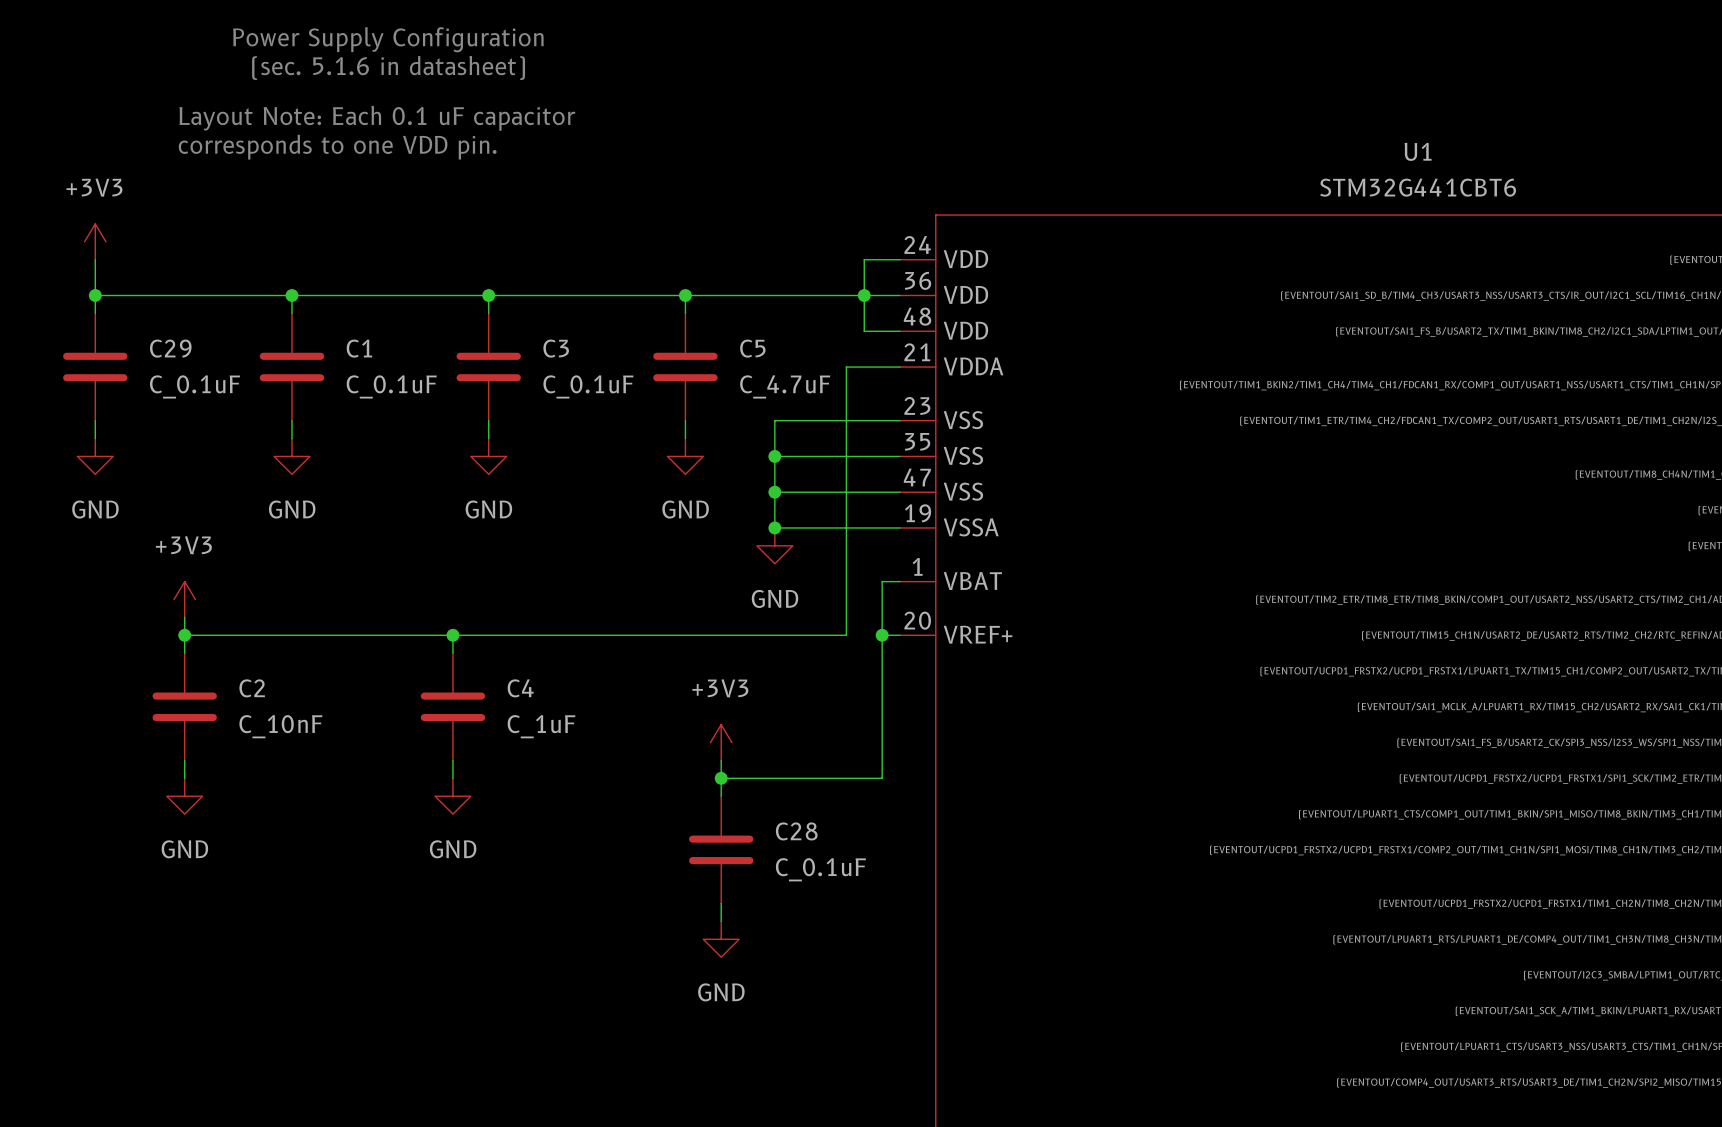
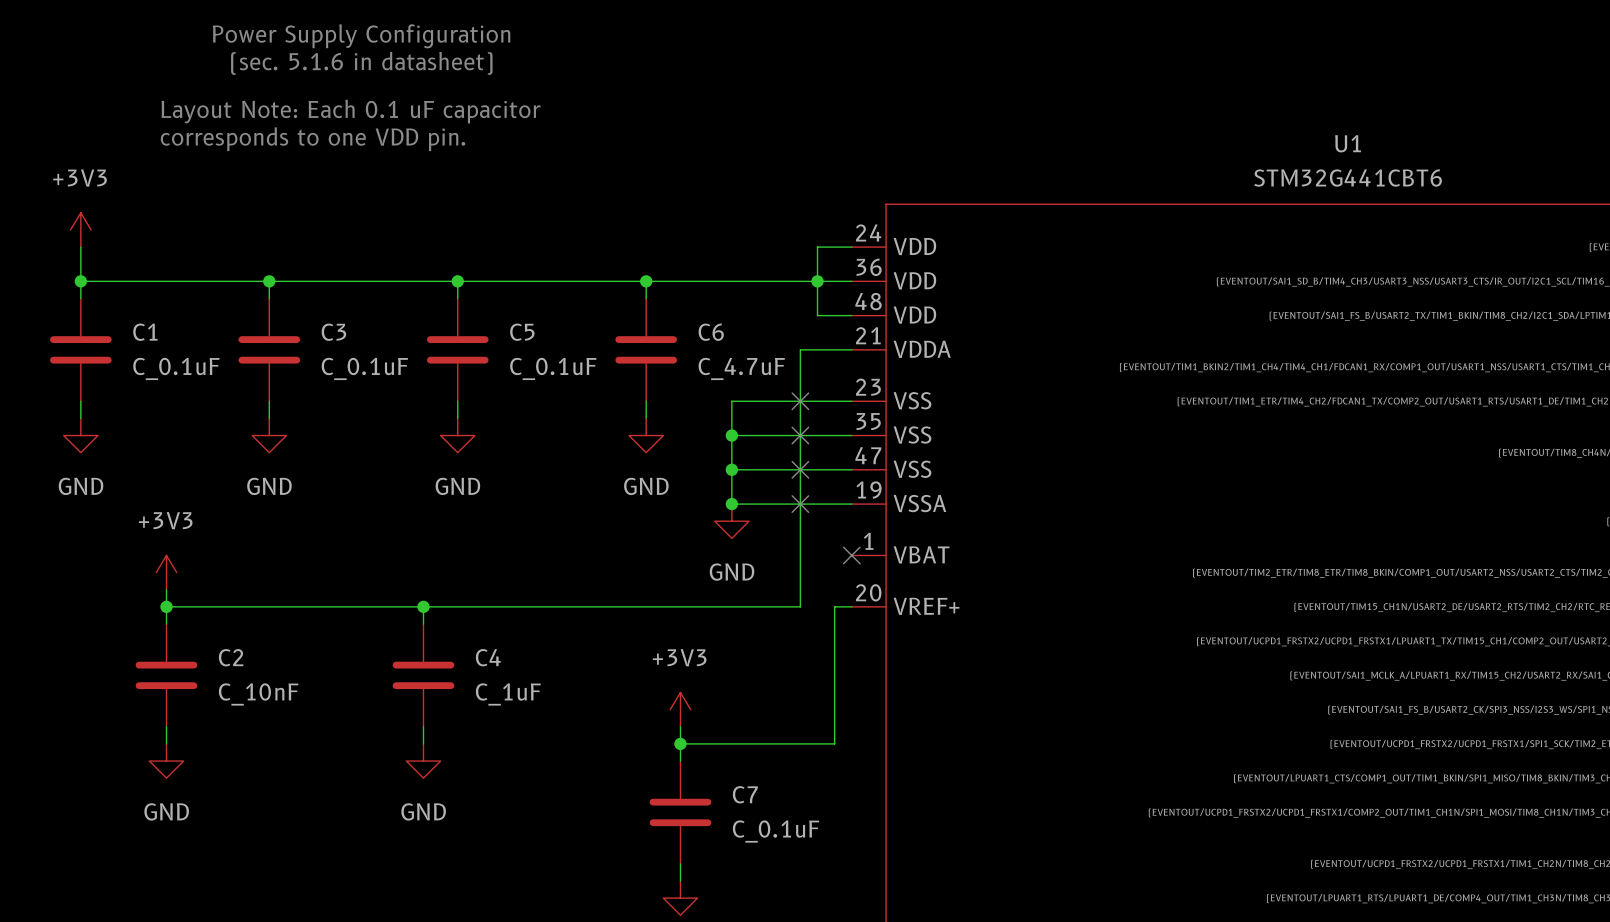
C29 name: C29 (170, 348) -> C1 (145, 332)
C1 name: C1 (359, 348) -> C3 (333, 332)
C3 name: C3 (556, 348) -> C5 (522, 332)
C5 name: C5 (752, 348) -> C6 (711, 332)
no-connect mark: none -> (800, 401)
no-connect mark: none -> (800, 435)
no-connect mark: none -> (800, 469)
no-connect mark: none -> (800, 504)
wire: (900, 581) (882, 581) (882, 635) -> none
no-connect mark: none -> (851, 555)
junction: (882, 635) -> none
C28 name: C28 (796, 831) -> C7 (745, 794)

